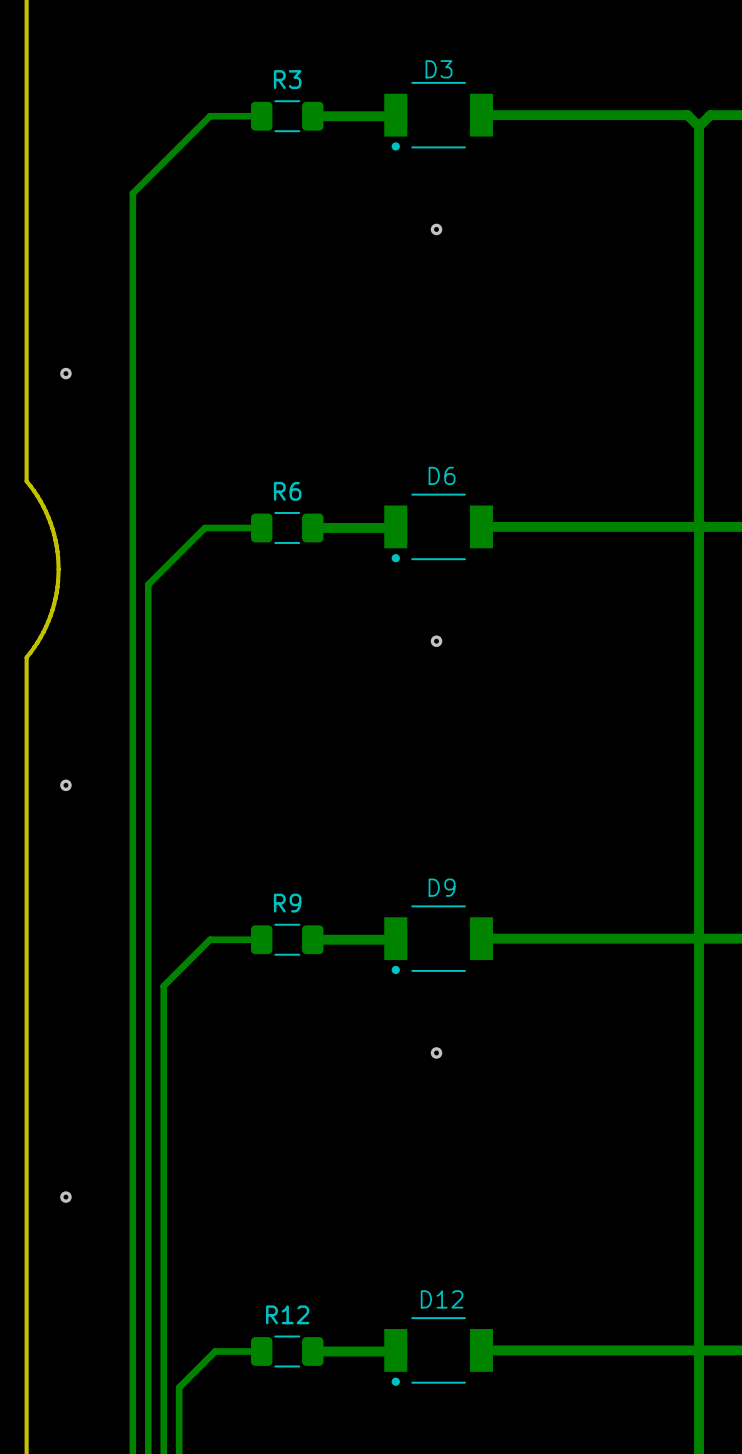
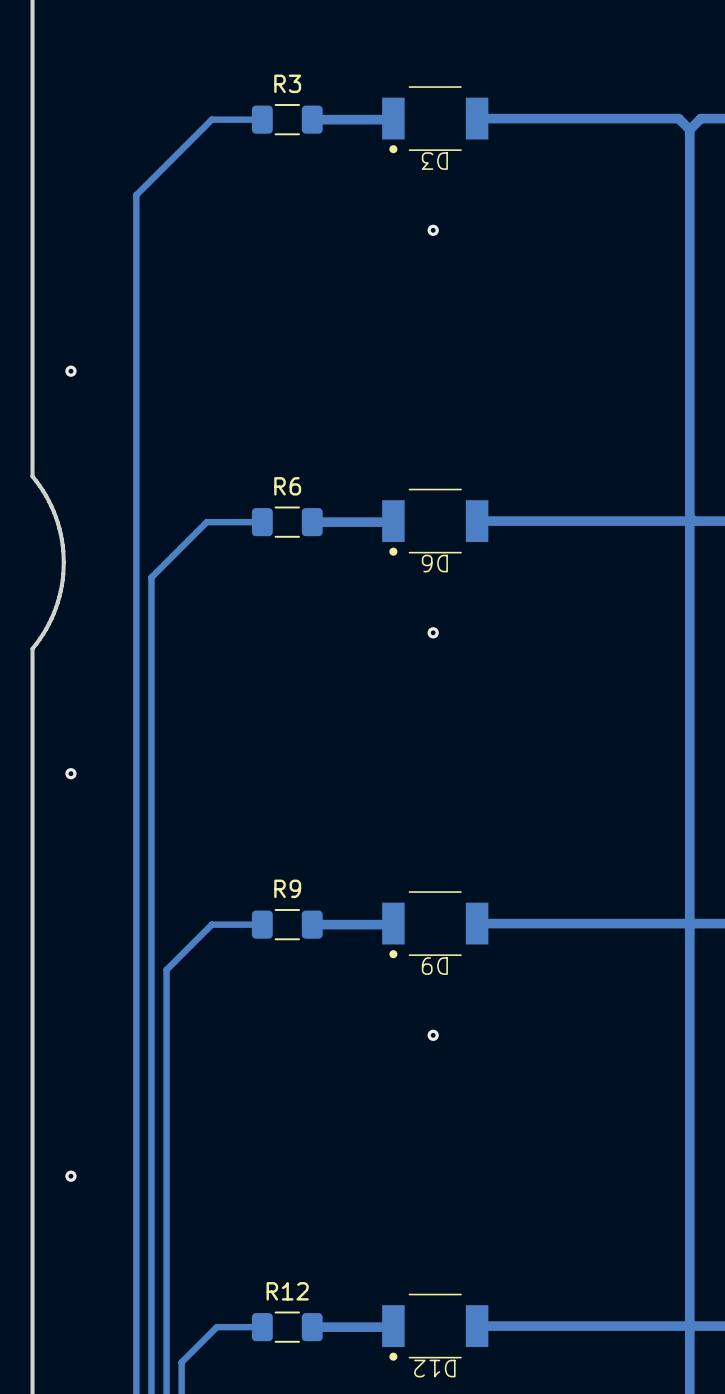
D3 name rotation: 0° (439, 69) -> 180° (434, 161)
D3 name position: D3 (439, 69) -> D3 (434, 161)
D6 name rotation: 0° (442, 475) -> 180° (434, 563)
D6 name position: D6 (442, 475) -> D6 (434, 563)
D9 name rotation: 0° (442, 887) -> 180° (434, 966)
D9 name position: D9 (442, 887) -> D9 (434, 966)
D12 name rotation: 0° (442, 1299) -> 180° (434, 1368)
D12 name position: D12 (442, 1299) -> D12 (434, 1368)

